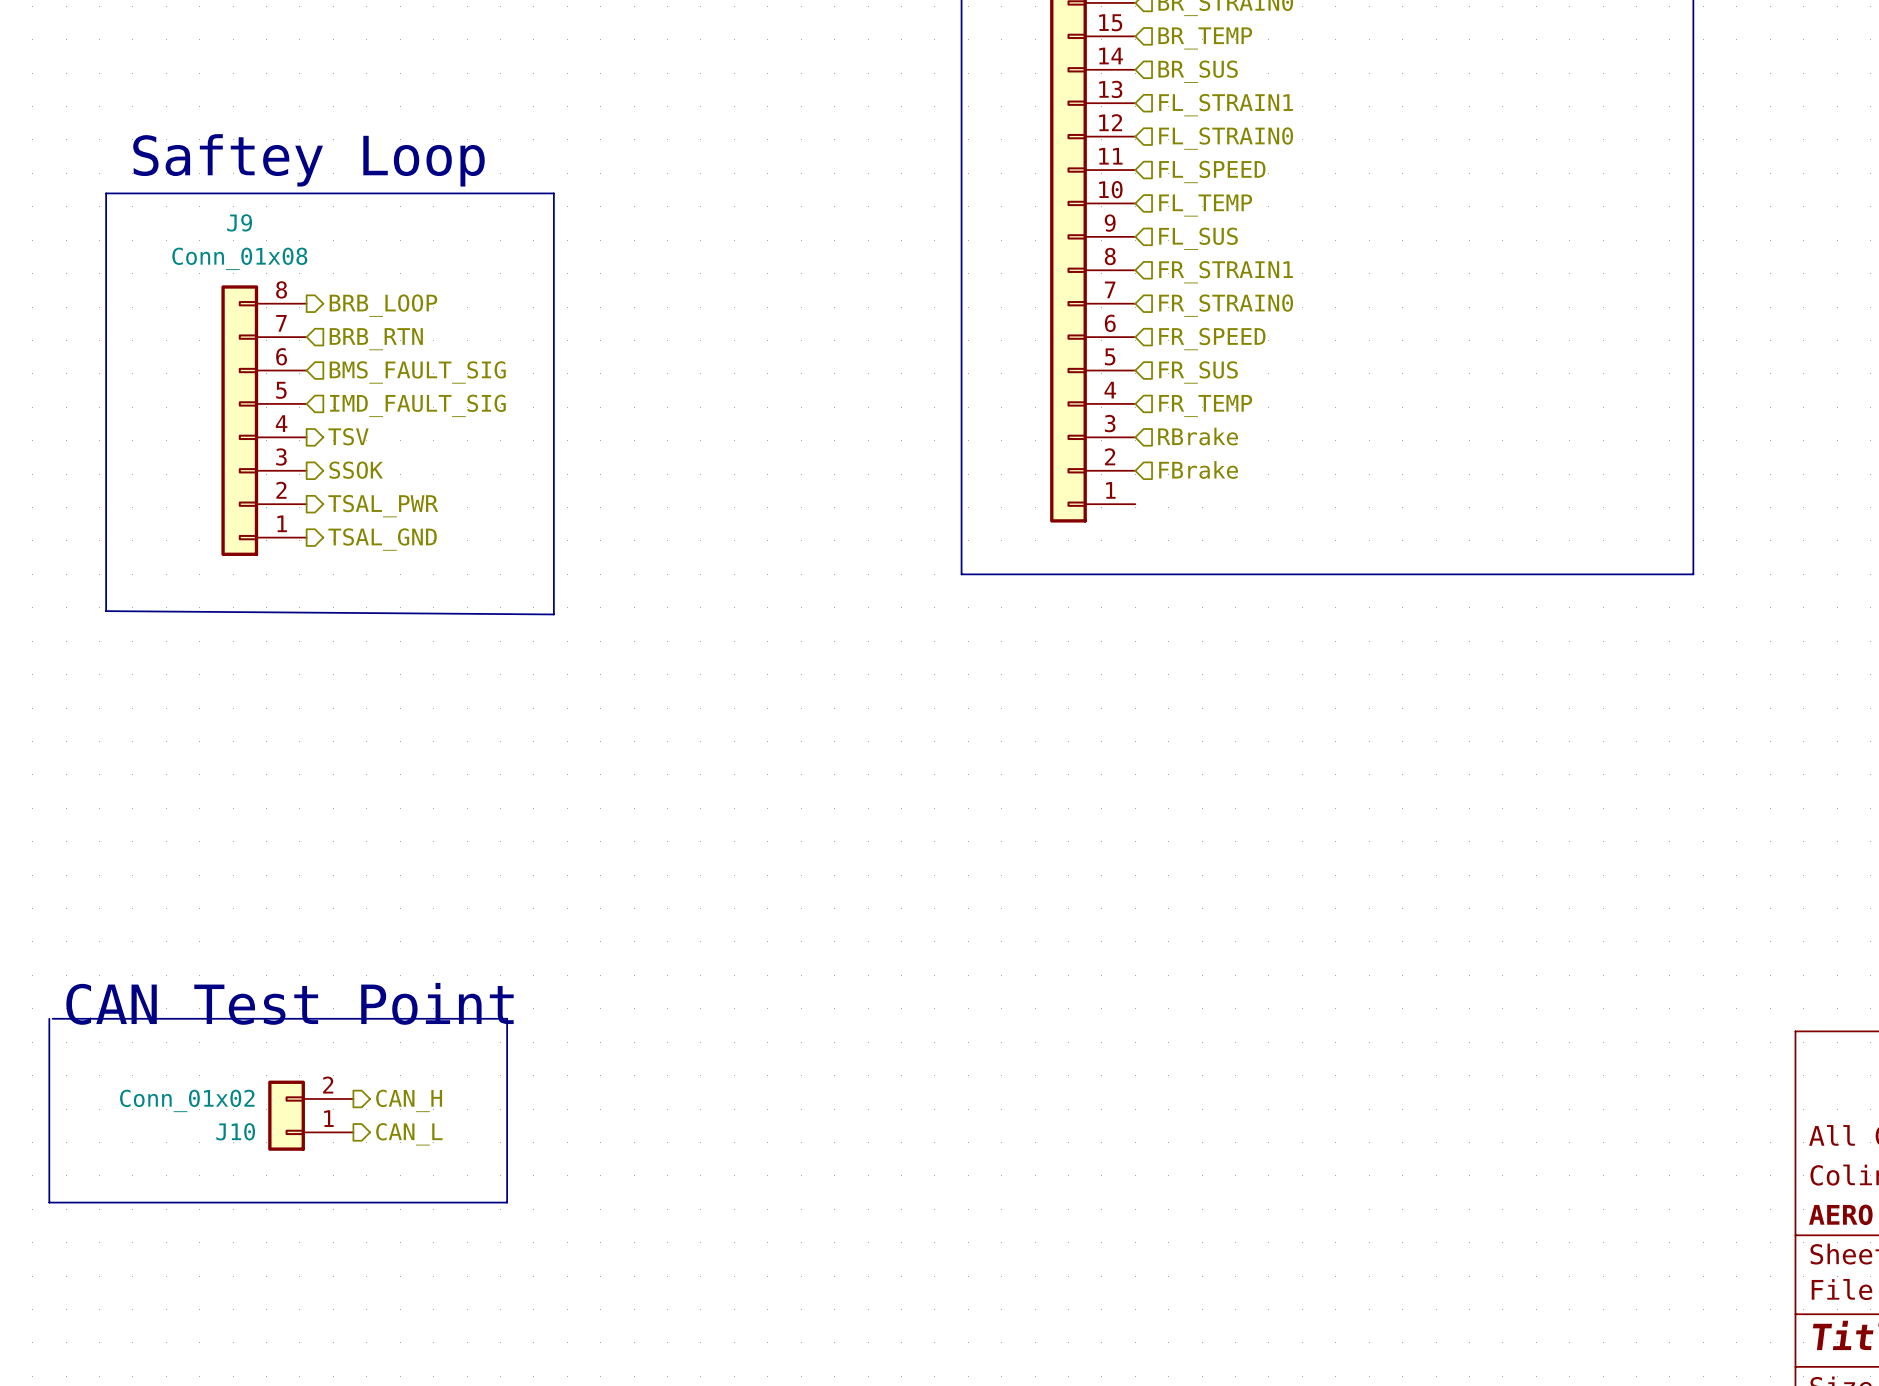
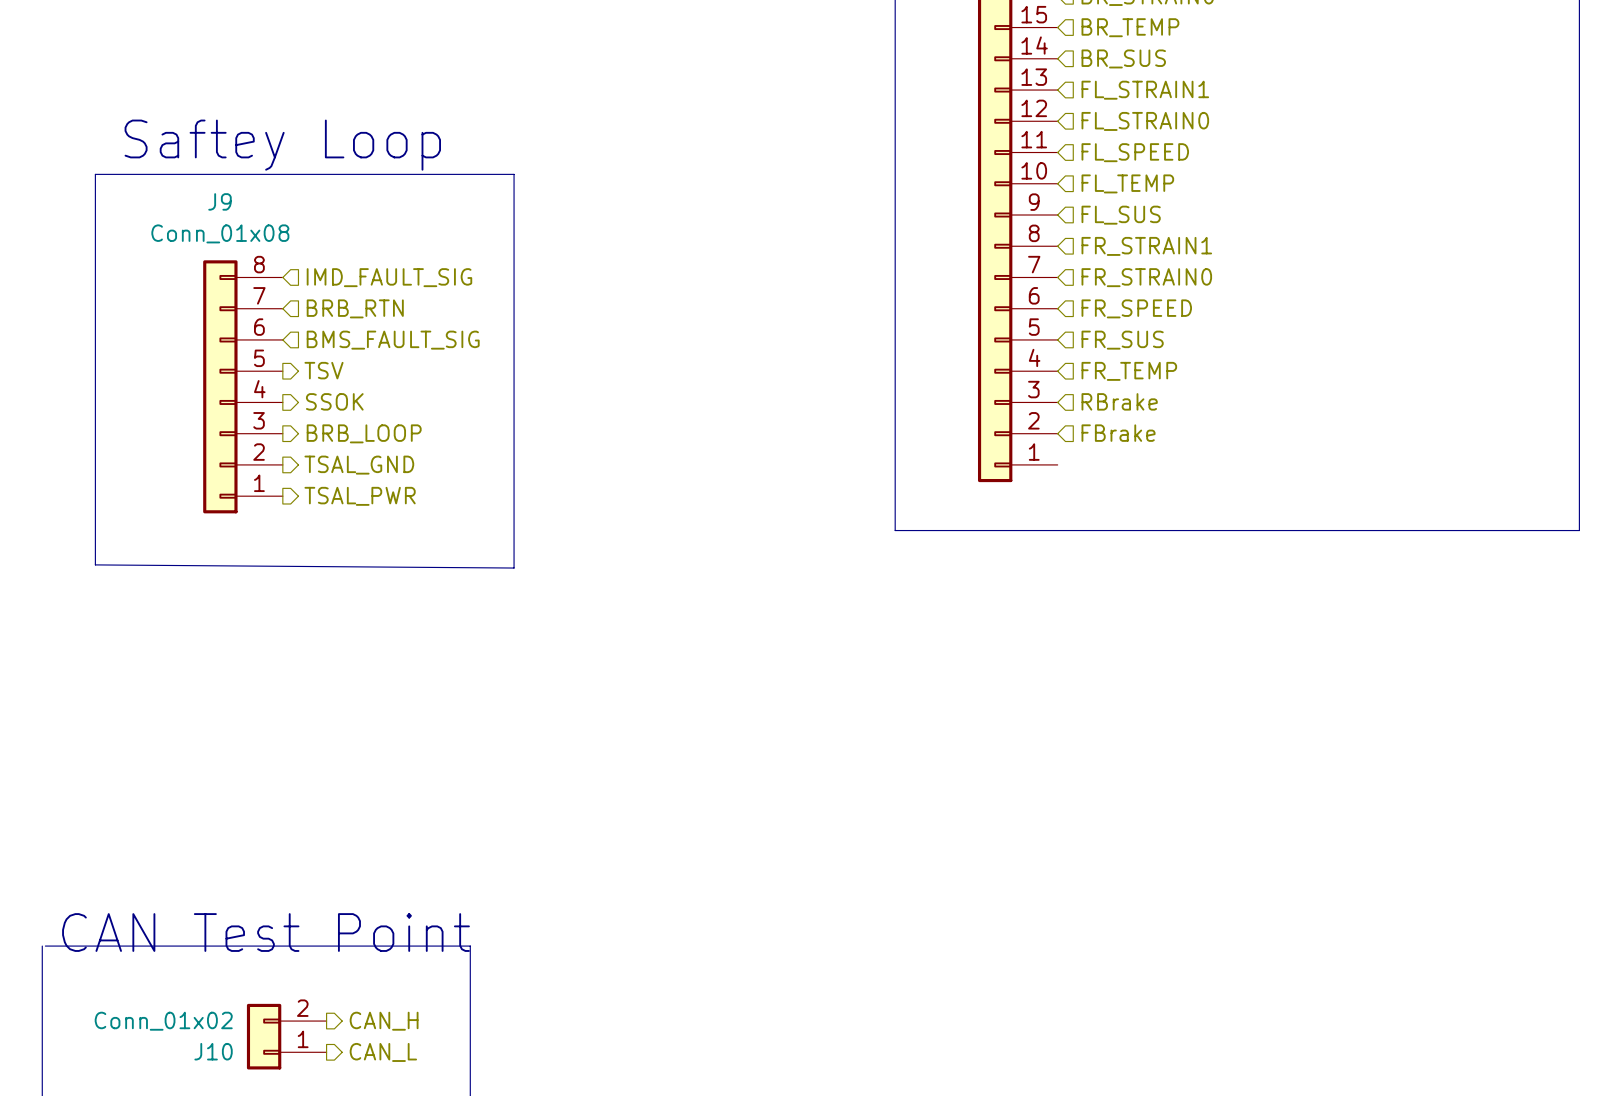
hierarchical label shape: output (383, 305) -> input (389, 277)
hierarchical label: BRB_LOOP (383, 305) -> IMD_FAULT_SIG (389, 277)
hierarchical label shape: input (417, 405) -> output (324, 370)
hierarchical label: IMD_FAULT_SIG (417, 405) -> TSV (324, 370)
hierarchical label: TSV (348, 436) -> SSOK (334, 401)
hierarchical label: SSOK (356, 470) -> BRB_LOOP (364, 433)
hierarchical label: TSAL_PWR (383, 506) -> TSAL_GND (359, 465)
hierarchical label: TSAL_GND (382, 539) -> TSAL_PWR (360, 496)

